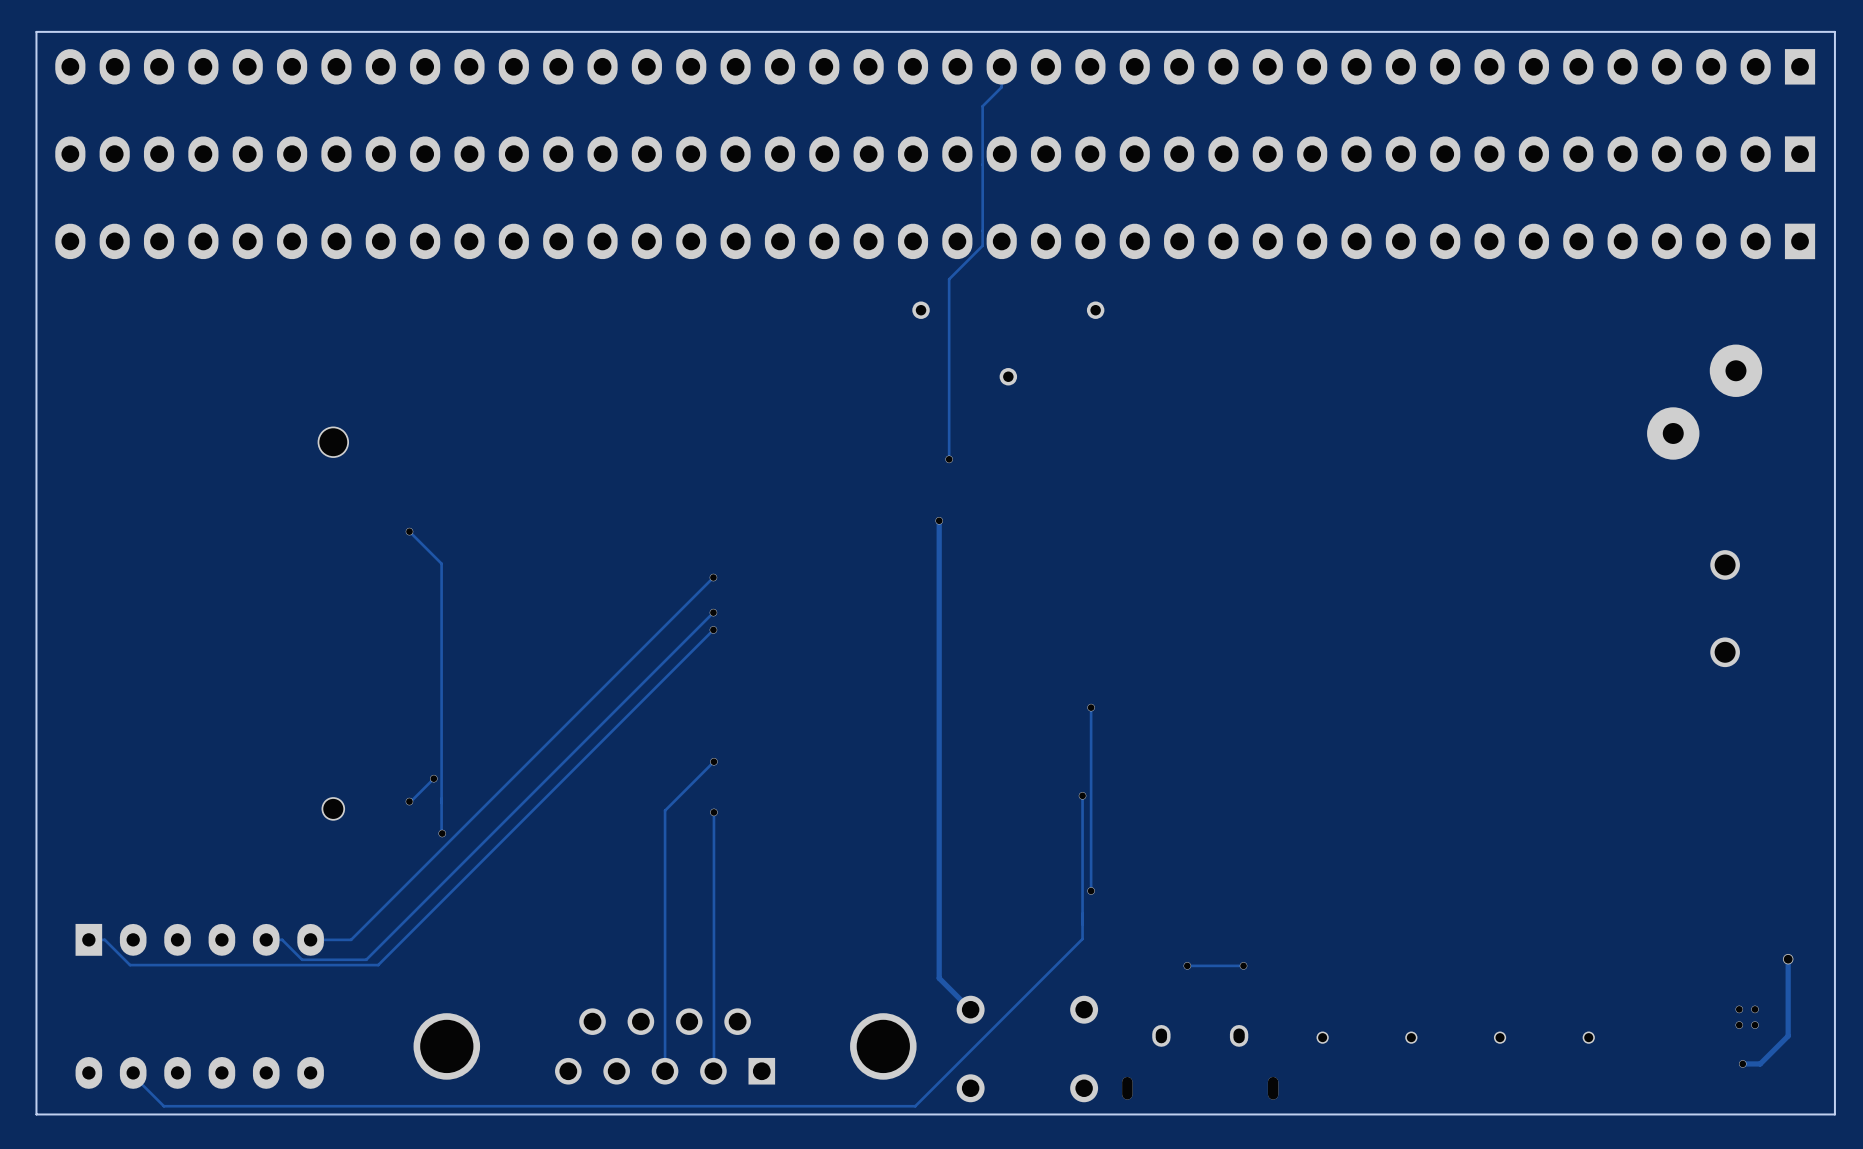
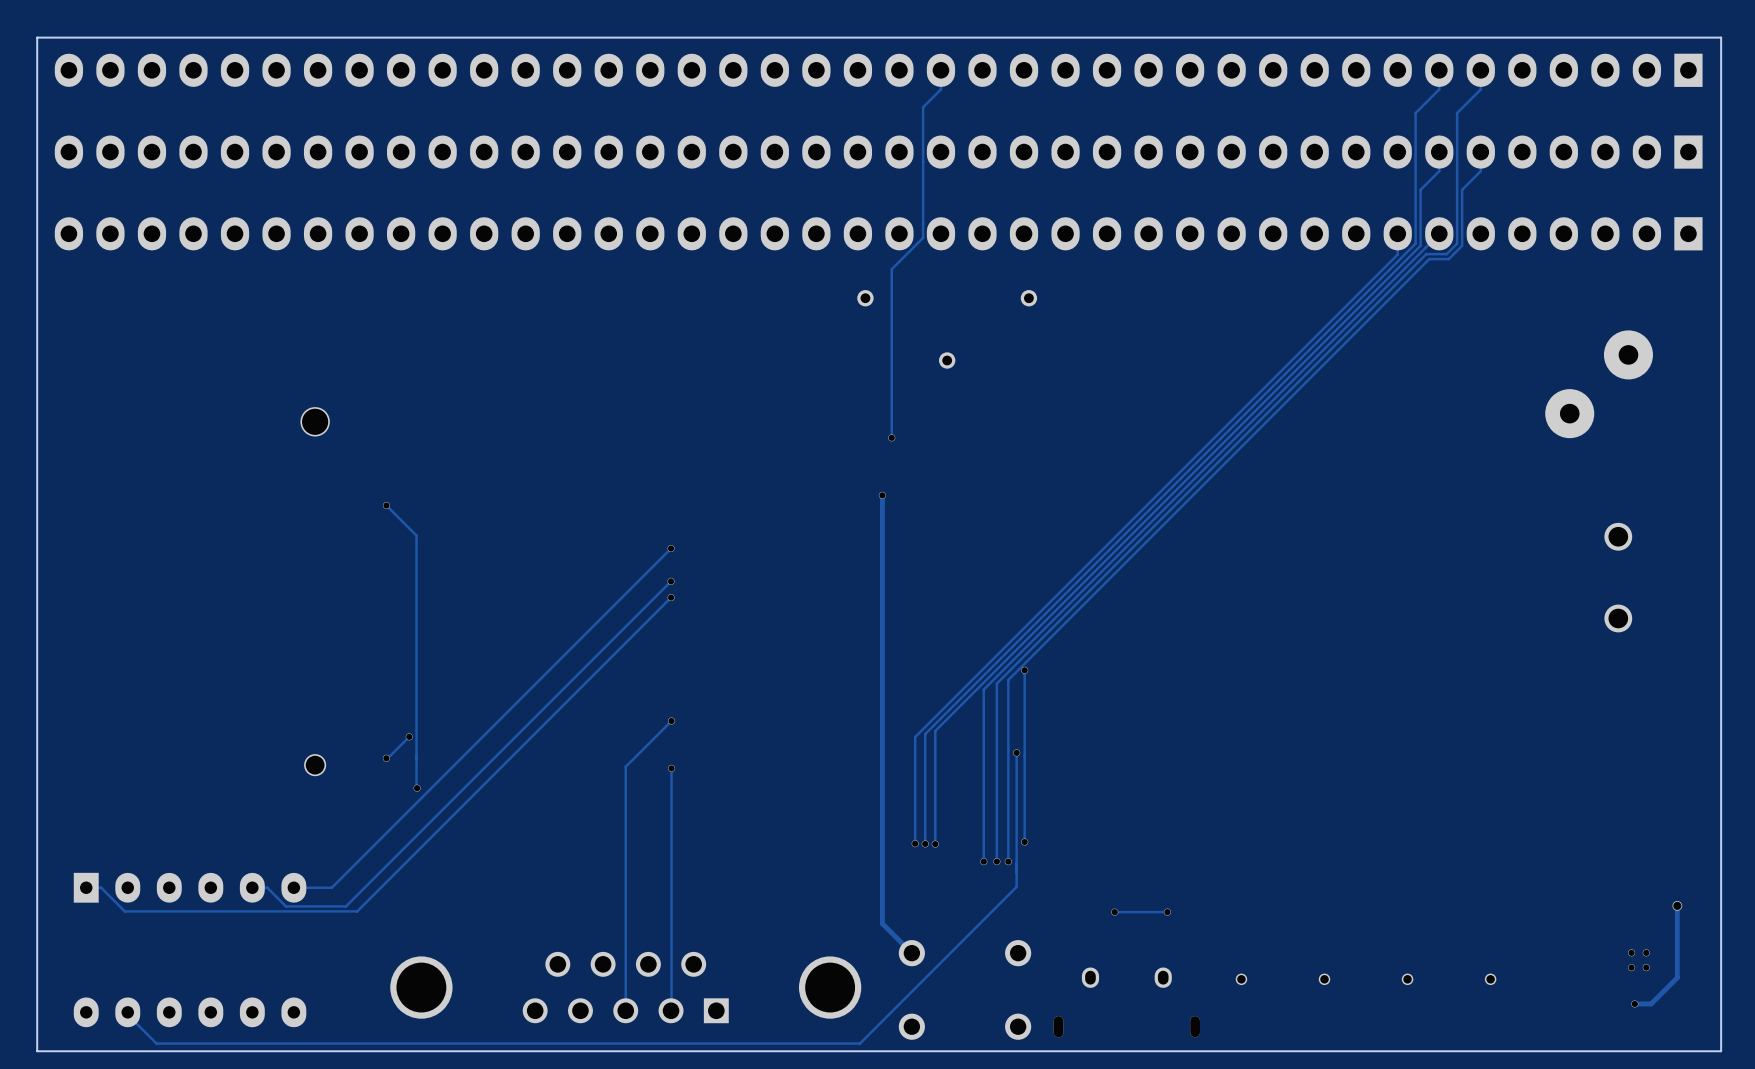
track: none -> (1439, 70) (1439, 89) (1415, 113) (1415, 243) (925, 734) (925, 843)
track: none -> (1480, 70) (1480, 89) (1457, 113) (1457, 243) (1446, 254) (1426, 254) (996, 683) (996, 861)
track: none -> (1439, 152) (1439, 171) (1420, 189) (1420, 245) (935, 731) (935, 844)
track: none -> (1480, 152) (1480, 171) (1462, 189) (1462, 245) (1448, 259) (1429, 259) (1008, 680) (1008, 861)
track: none -> (1397, 233) (1397, 254) (915, 737) (915, 843)
track: none -> (1439, 234) (983, 689) (983, 861)
via: none -> (915, 843)
via: none -> (925, 843)
via: none -> (935, 844)
via: none -> (983, 861)
via: none -> (996, 861)
via: none -> (1008, 861)

